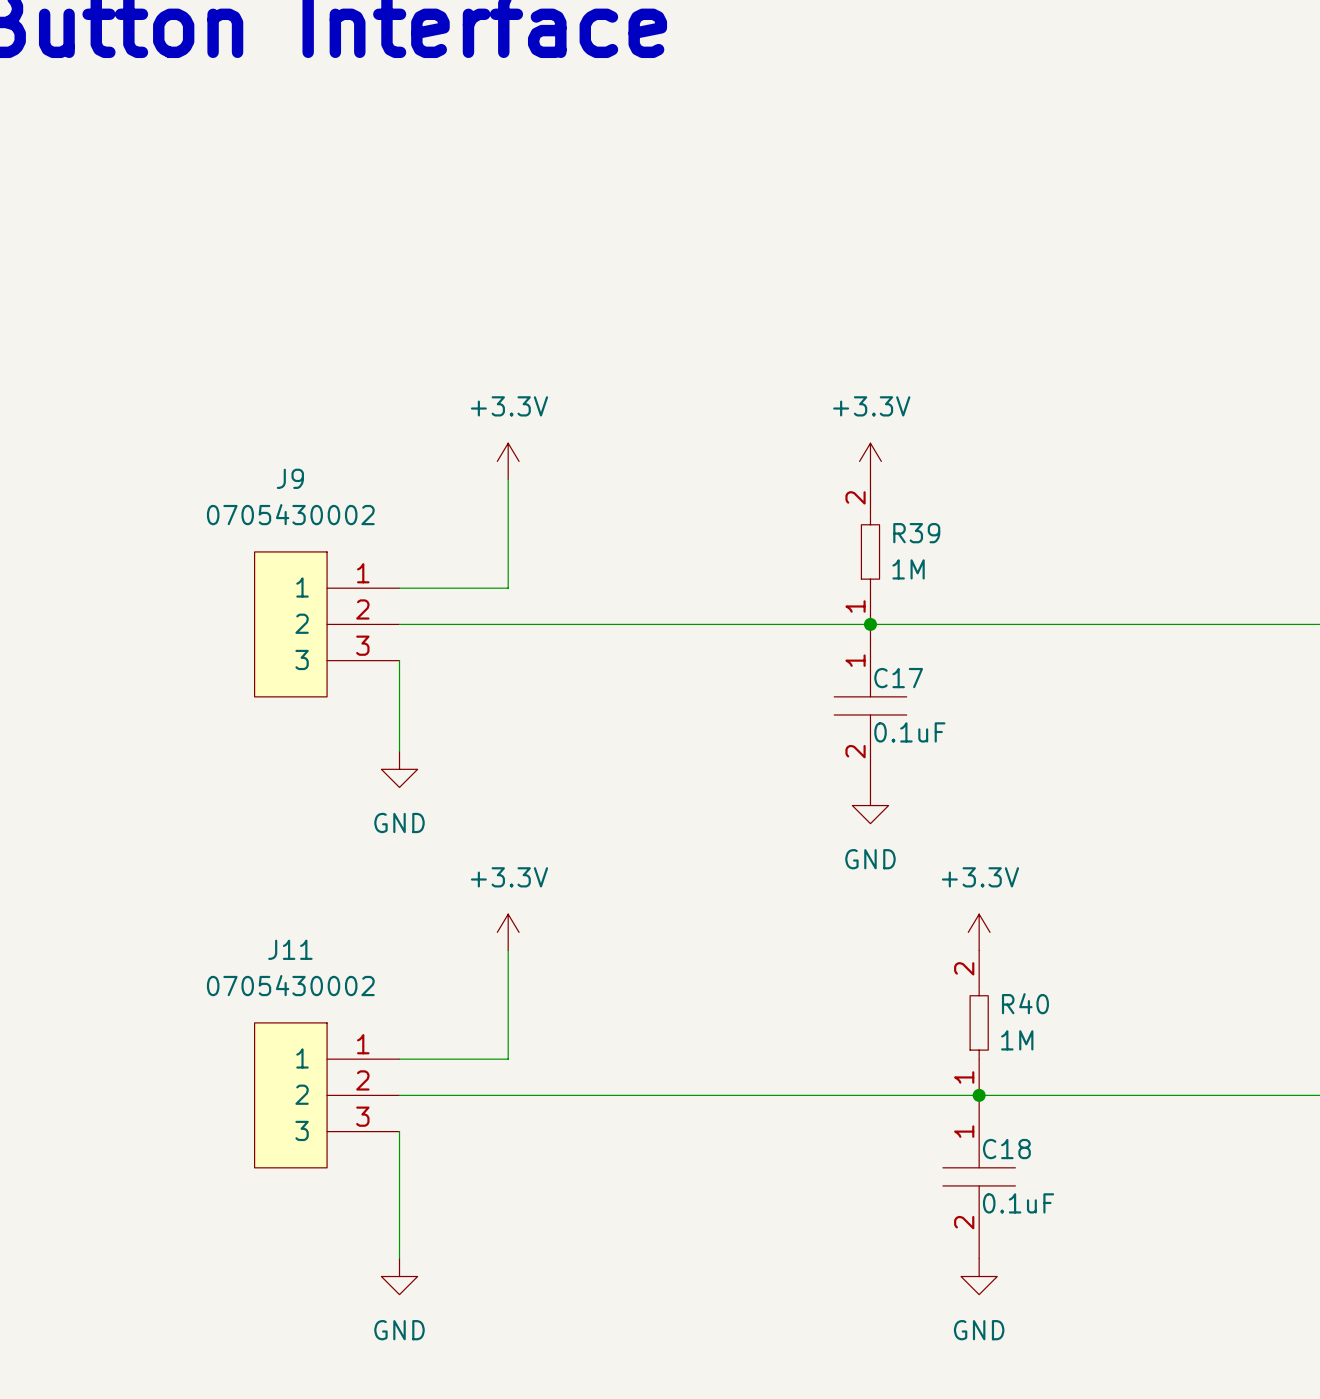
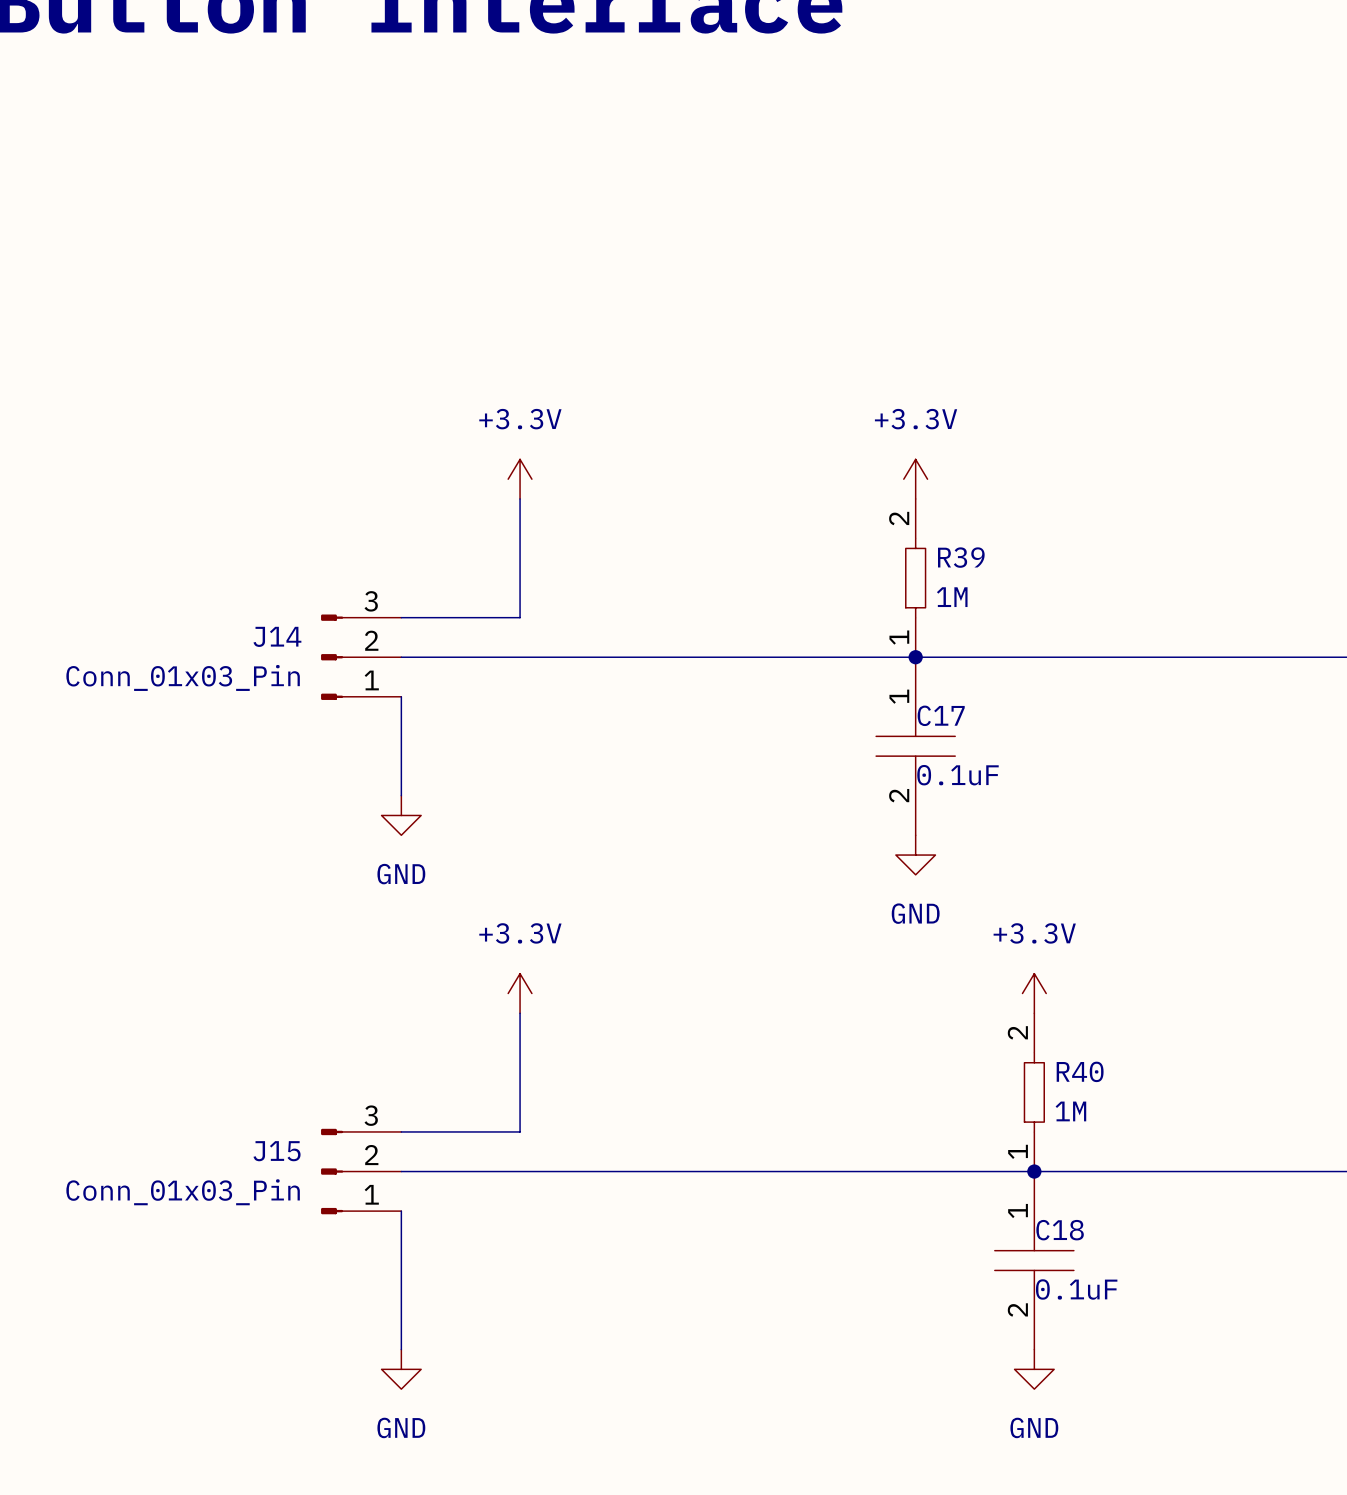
J9: 0705430002 (327, 624) -> none
J14: none -> Conn_01x03_Pin (361, 657)
J11: 0705430002 (327, 1095) -> none
J15: none -> Conn_01x03_Pin (361, 1171)

